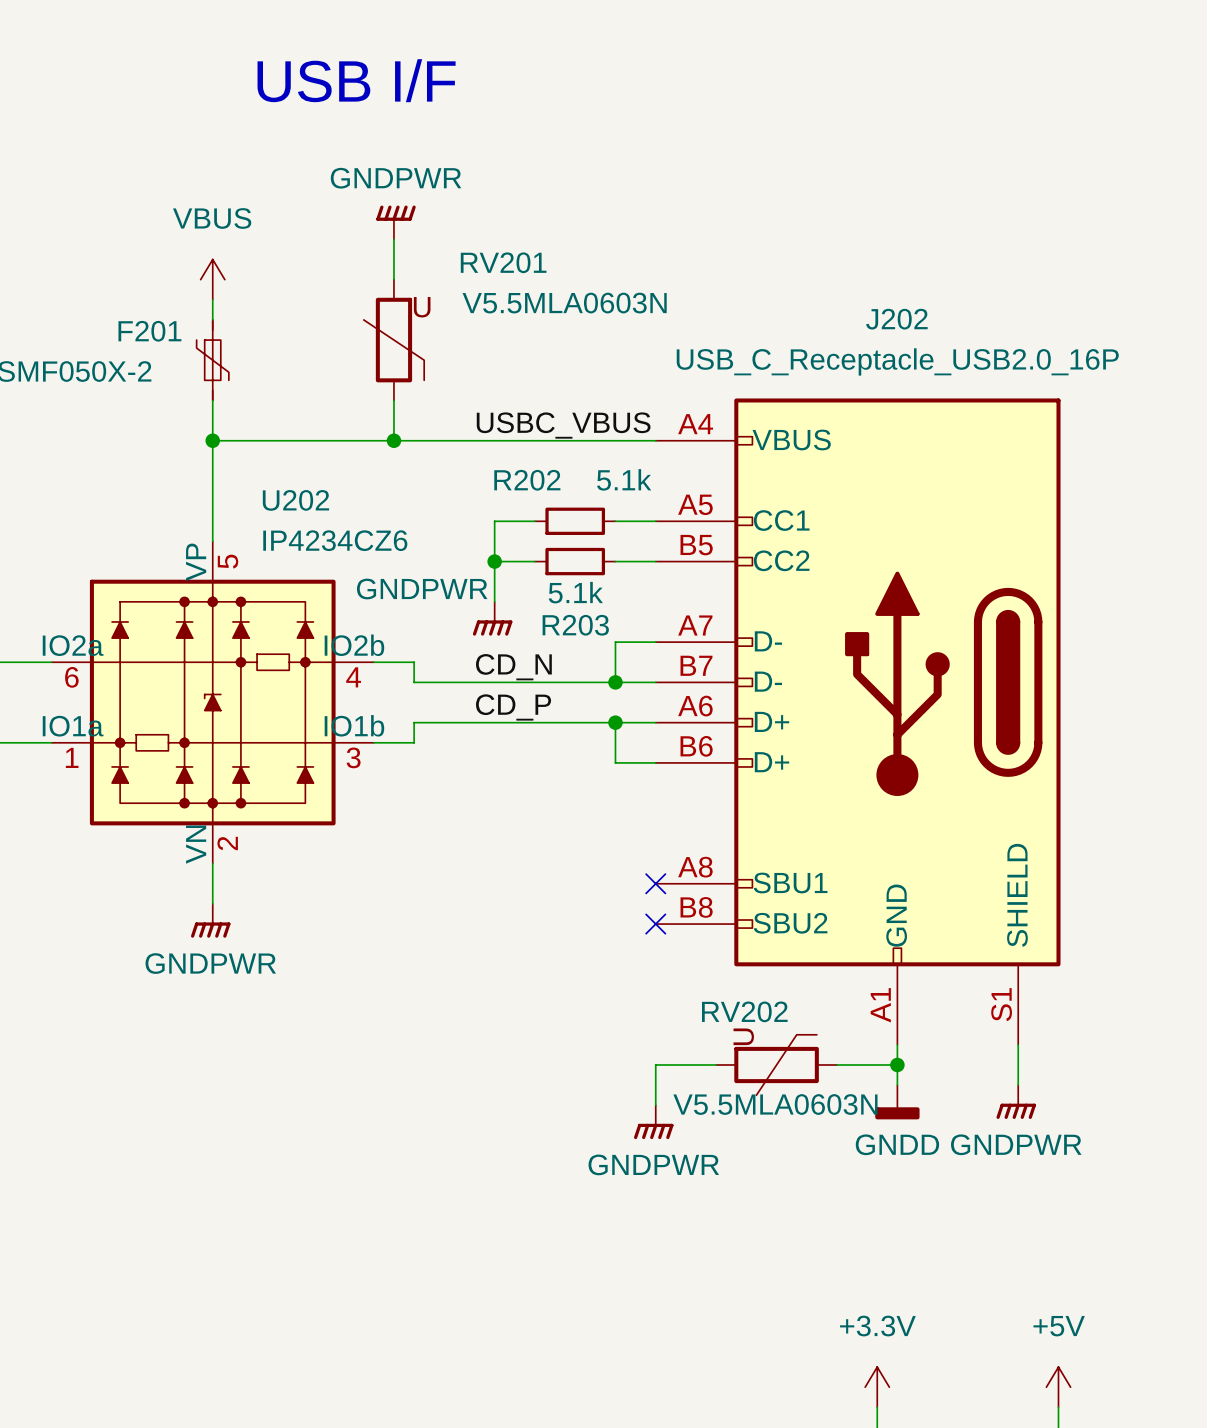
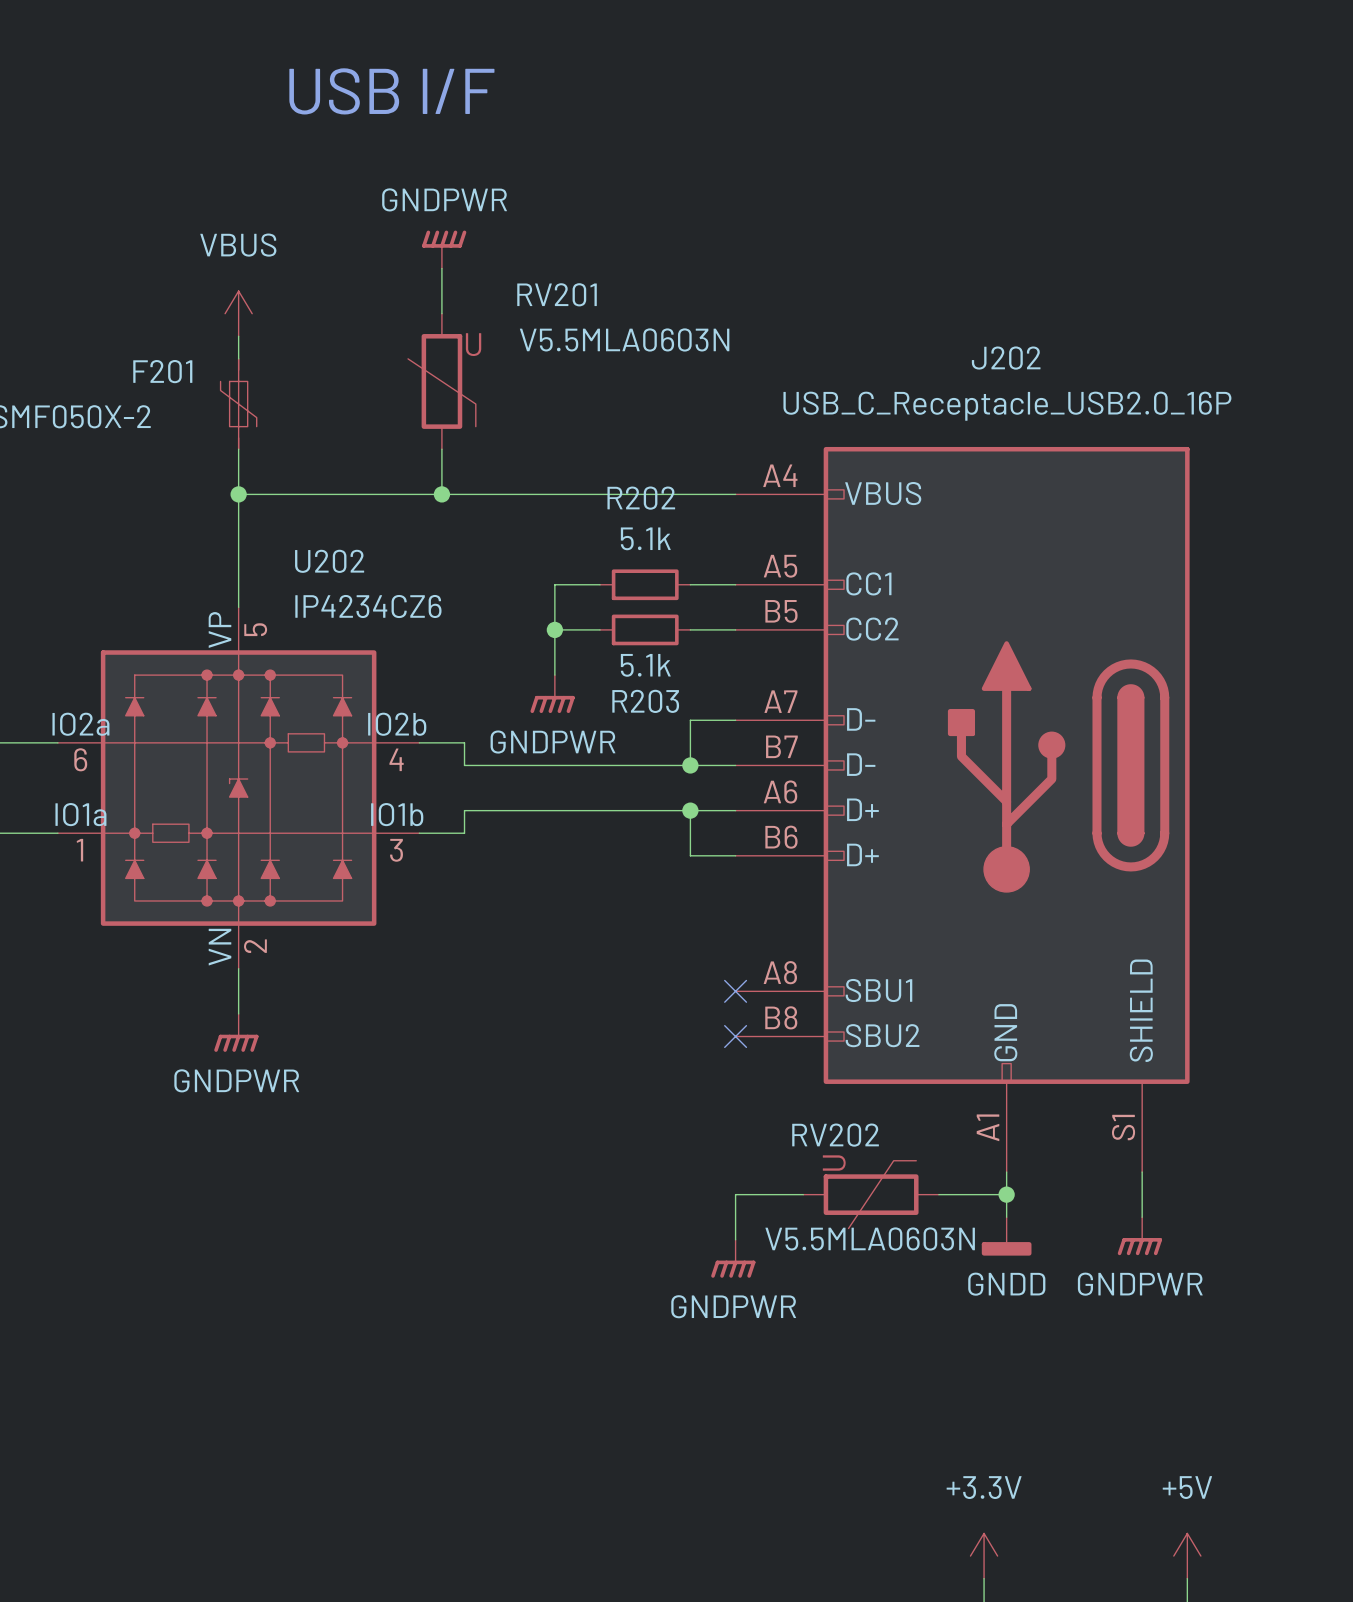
label: USBC_VBUS (563, 425) -> none
R202 value position: 5.1k (624, 479) -> 5.1k (645, 538)
R202 name position: R202 (527, 480) -> R202 (641, 498)
power symbol text position: GNDPWR (422, 589) -> GNDPWR (552, 742)
label: CD_N (513, 667) -> none
label: CD_P (513, 707) -> none

